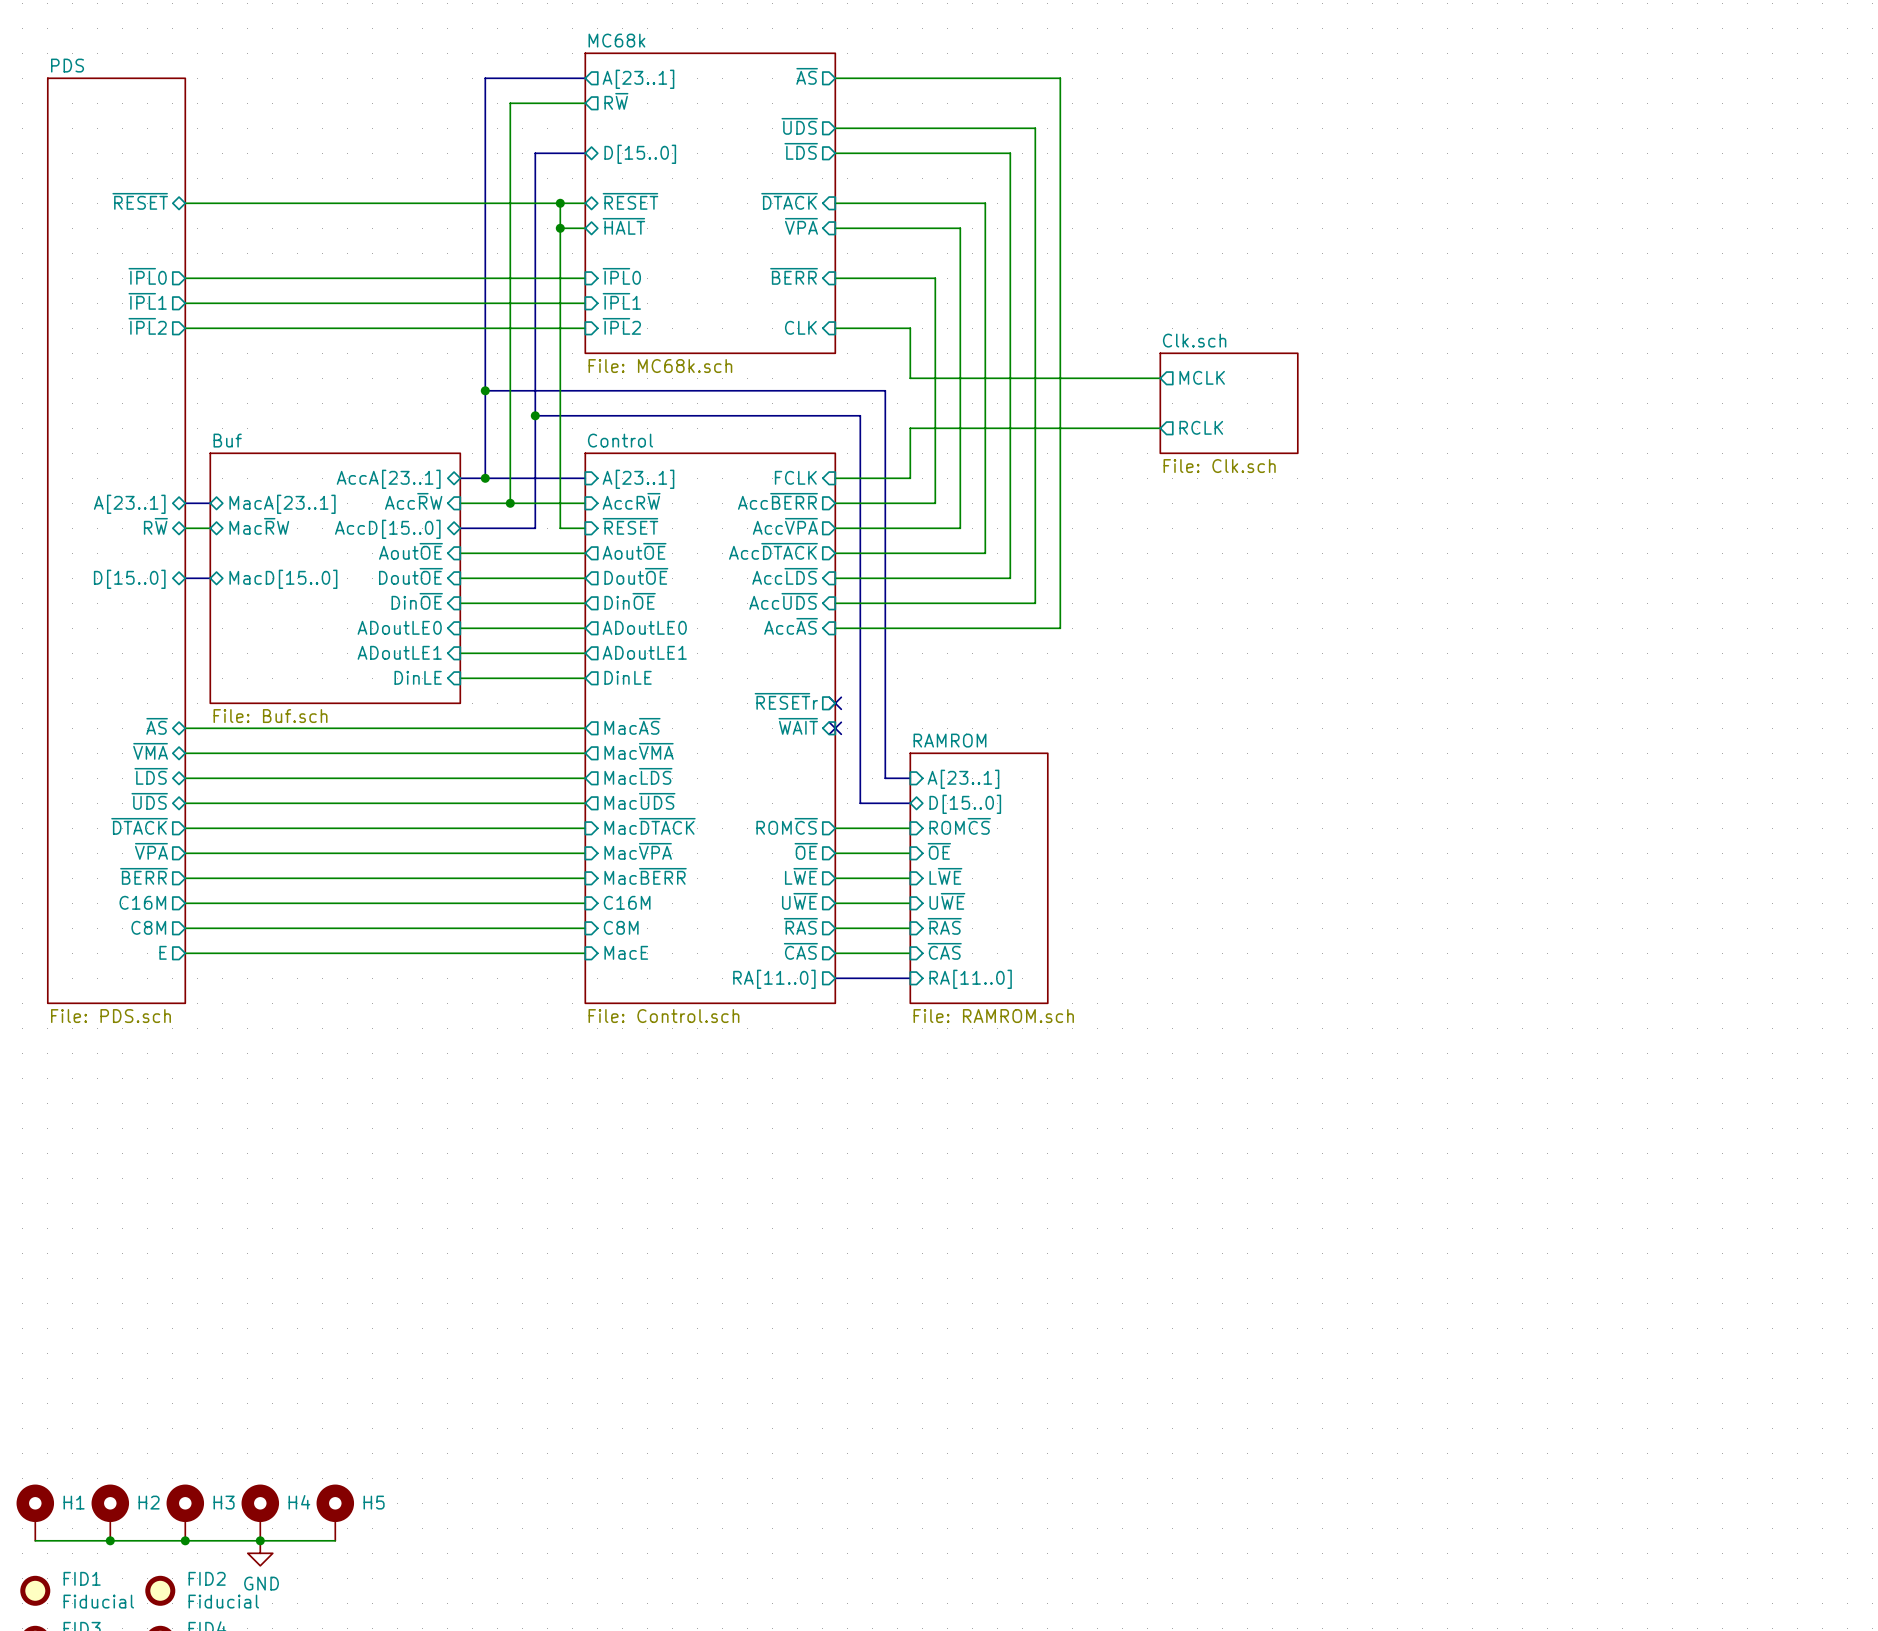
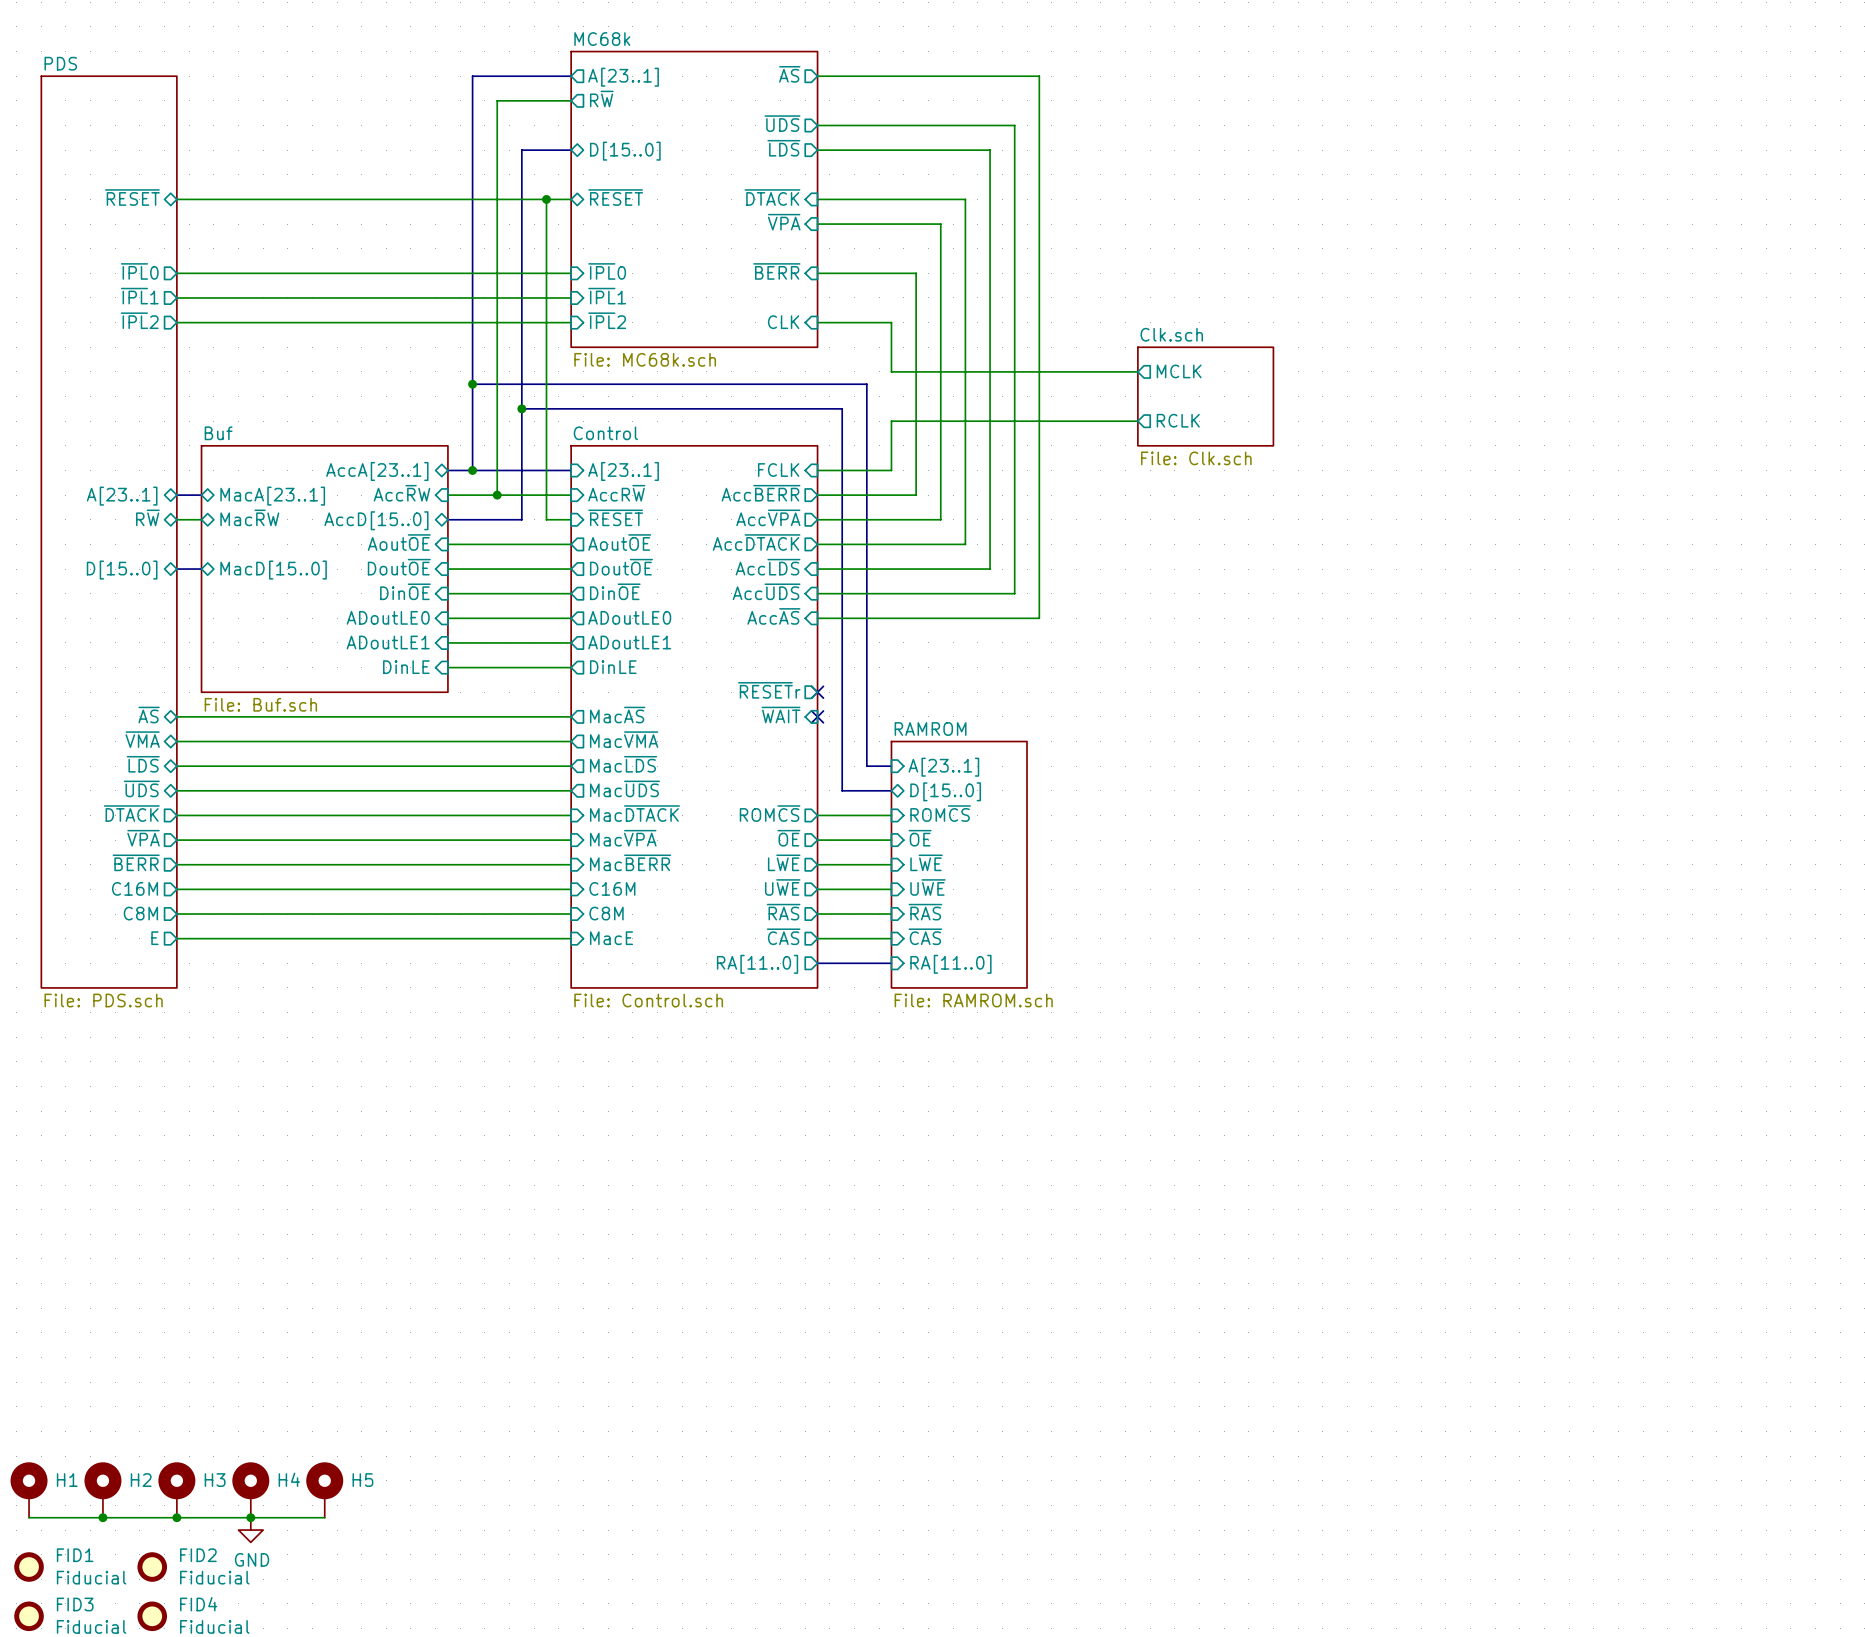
sheet pin: ~{HALT} (623, 226) -> none
wire: (560, 228) (585, 228) -> none
junction: (560, 228) -> none

